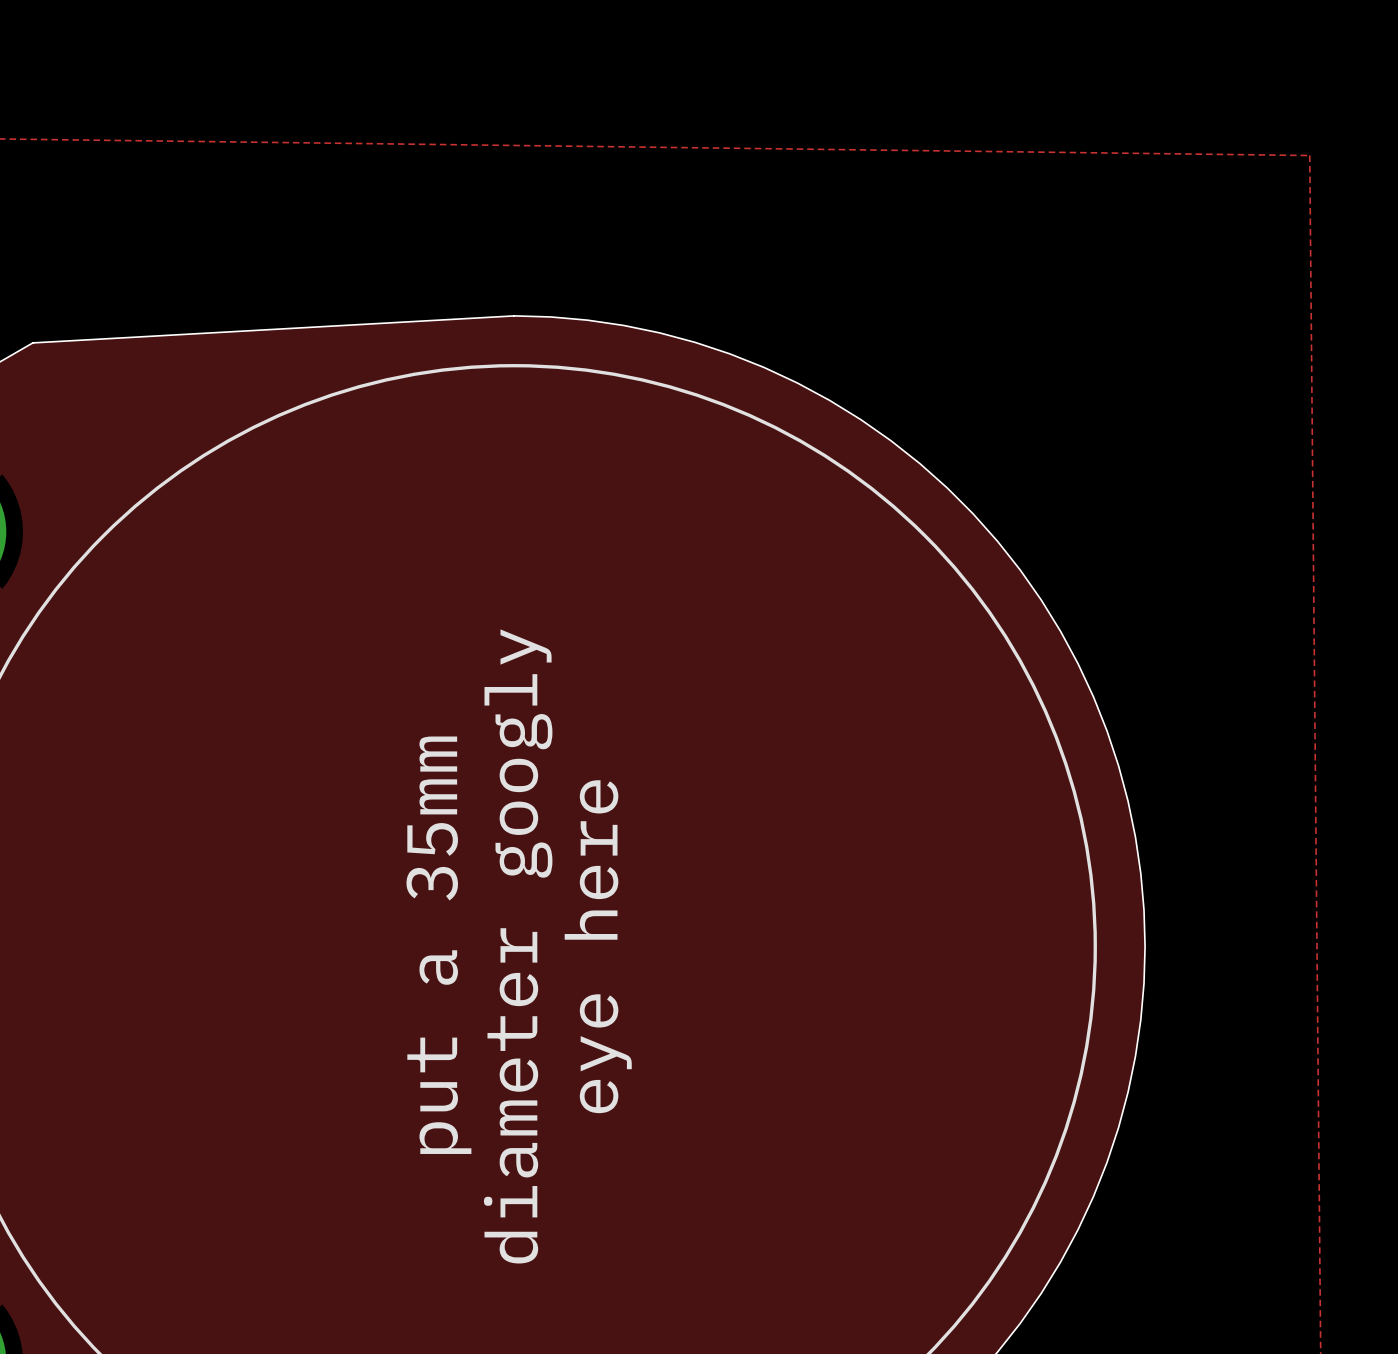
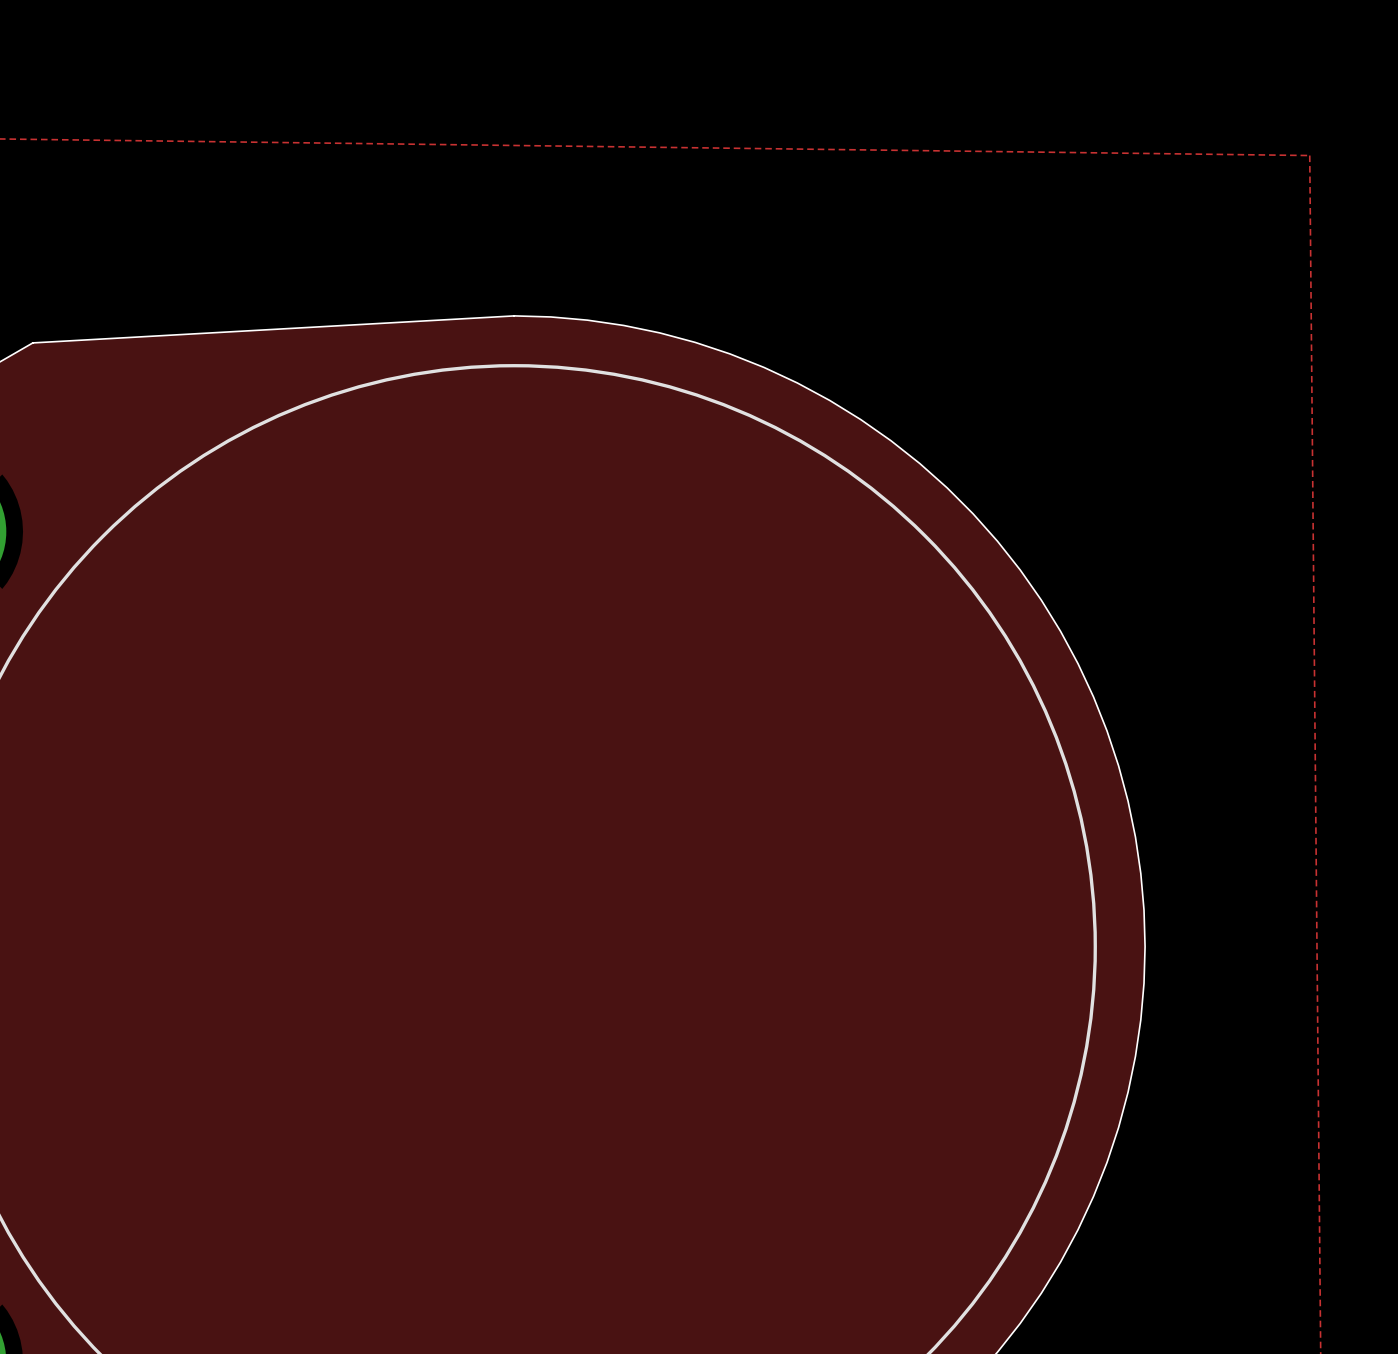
text: put a 35mm (438, 945) -> none
text: diameter googly (518, 946) -> none
text: eye here (598, 946) -> none

